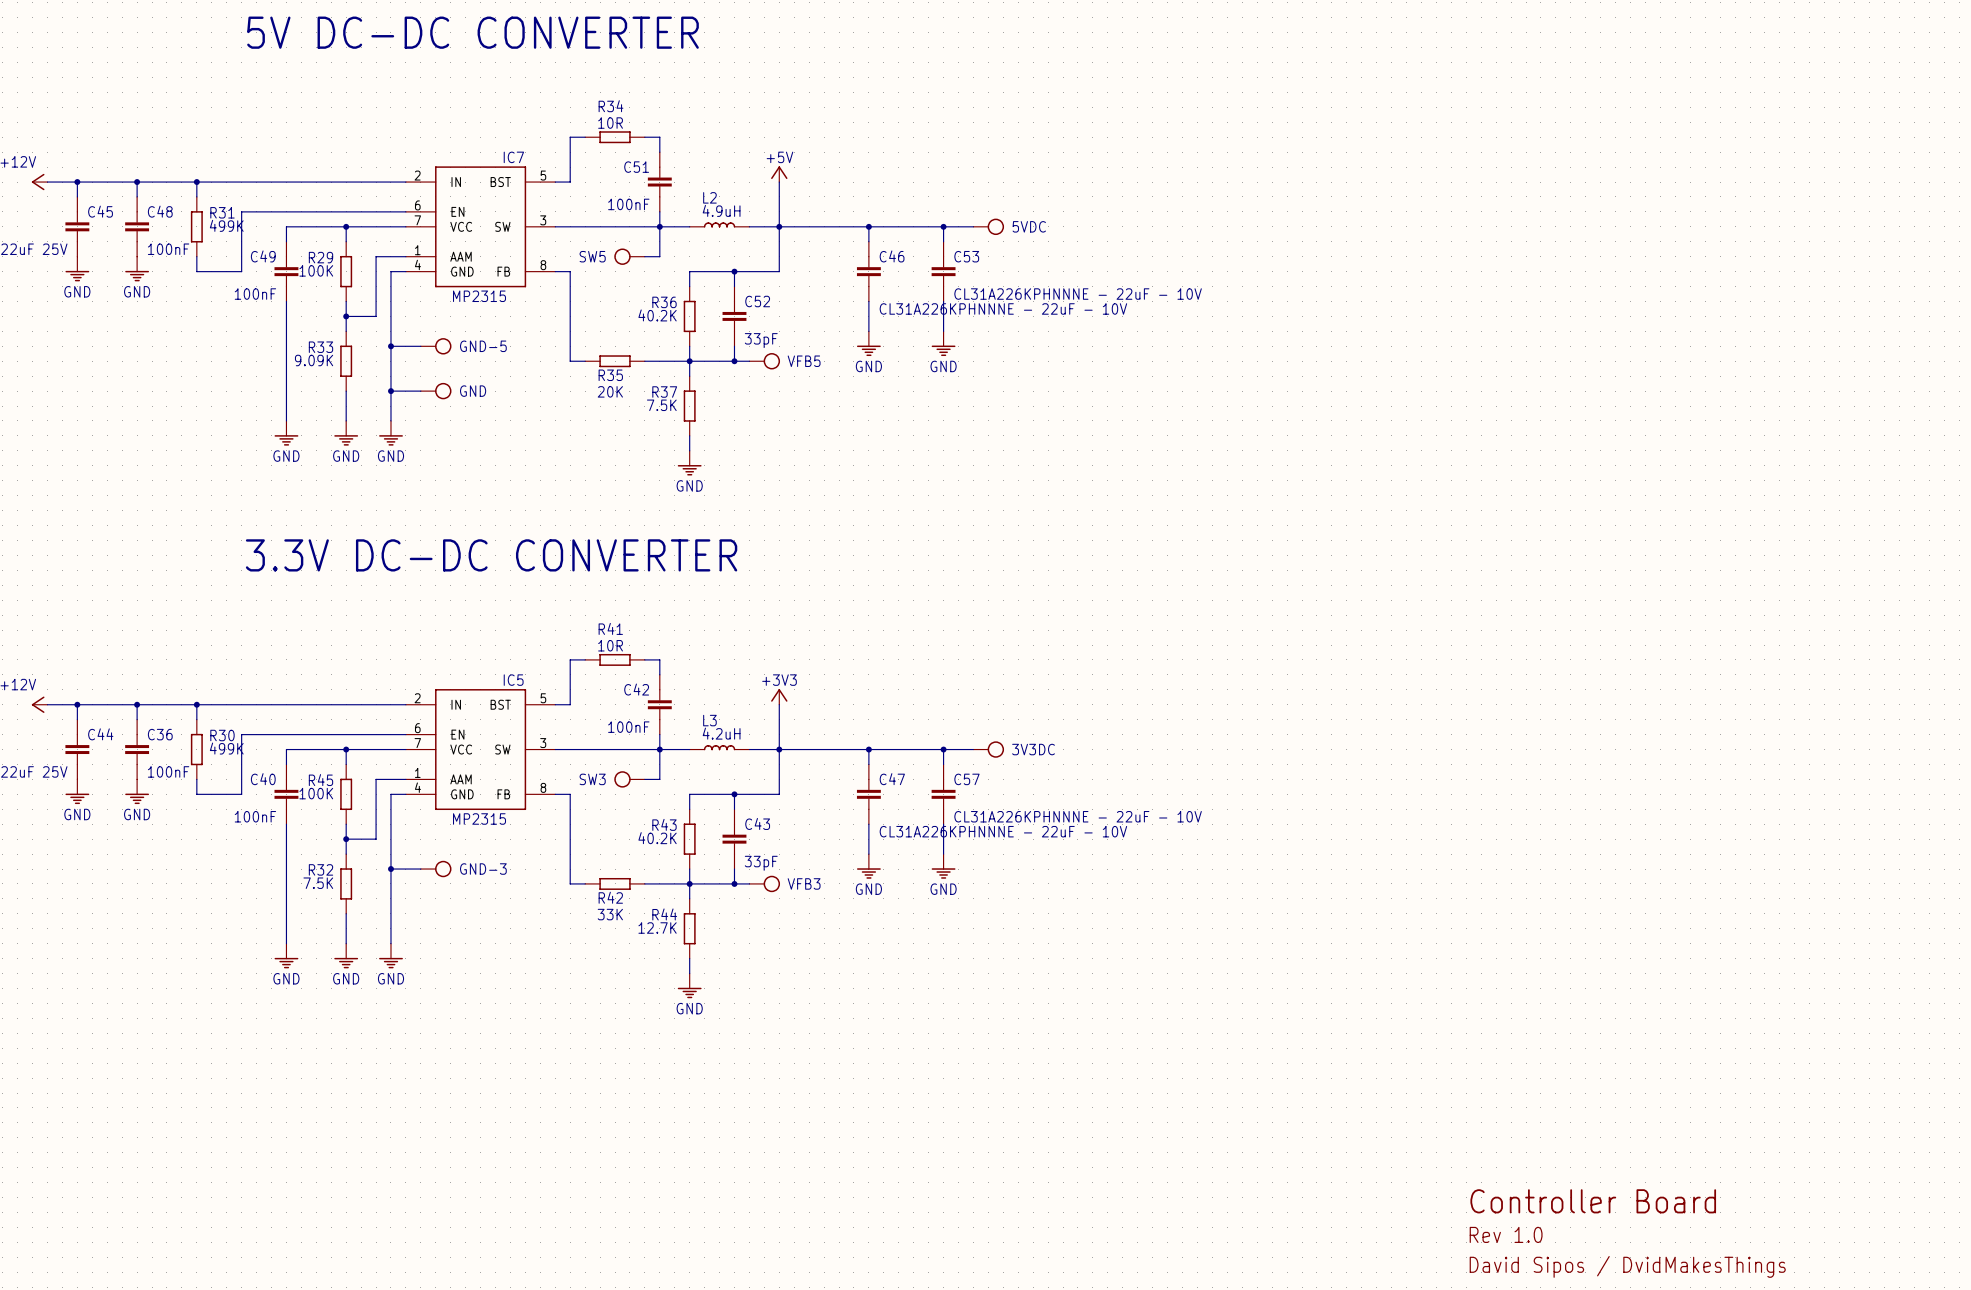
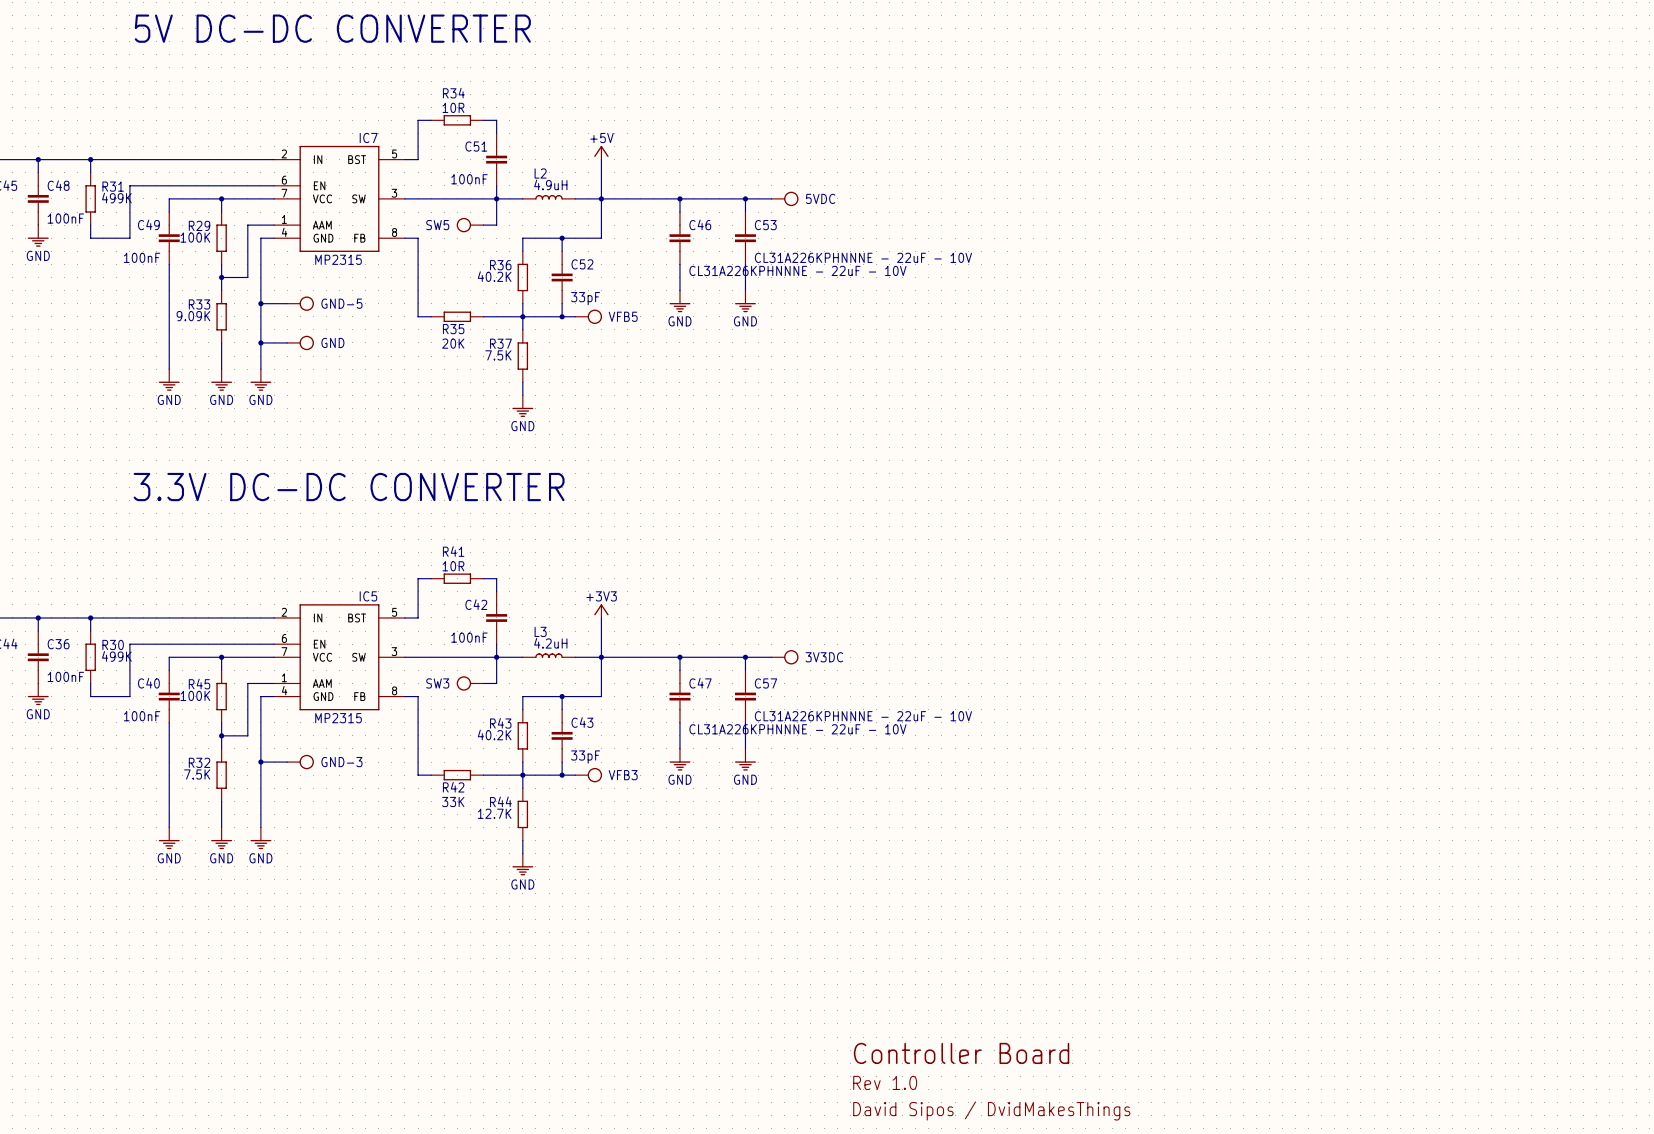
text: none -> Controller Board (961, 1053)
text: Controller Board (1593, 1201) -> none
text: none -> Rev 1.0 (885, 1082)
text: Rev 1.0 (1506, 1234) -> none
text: none -> David Sipos / DvidMakesThings (991, 1110)
text: David Sipos / DvidMakesThings (1627, 1266) -> none

